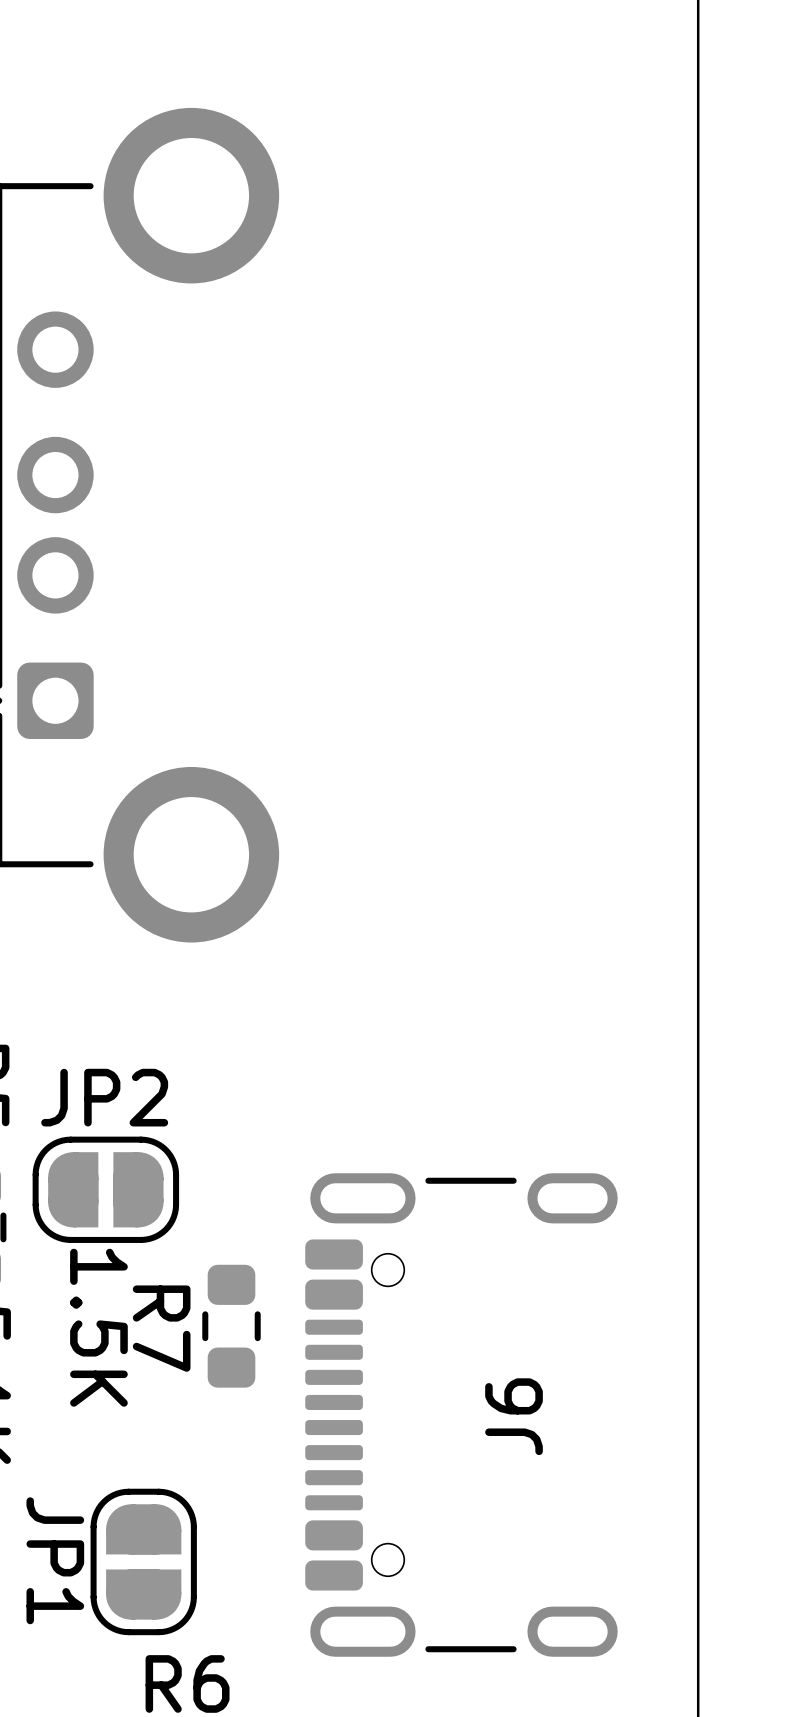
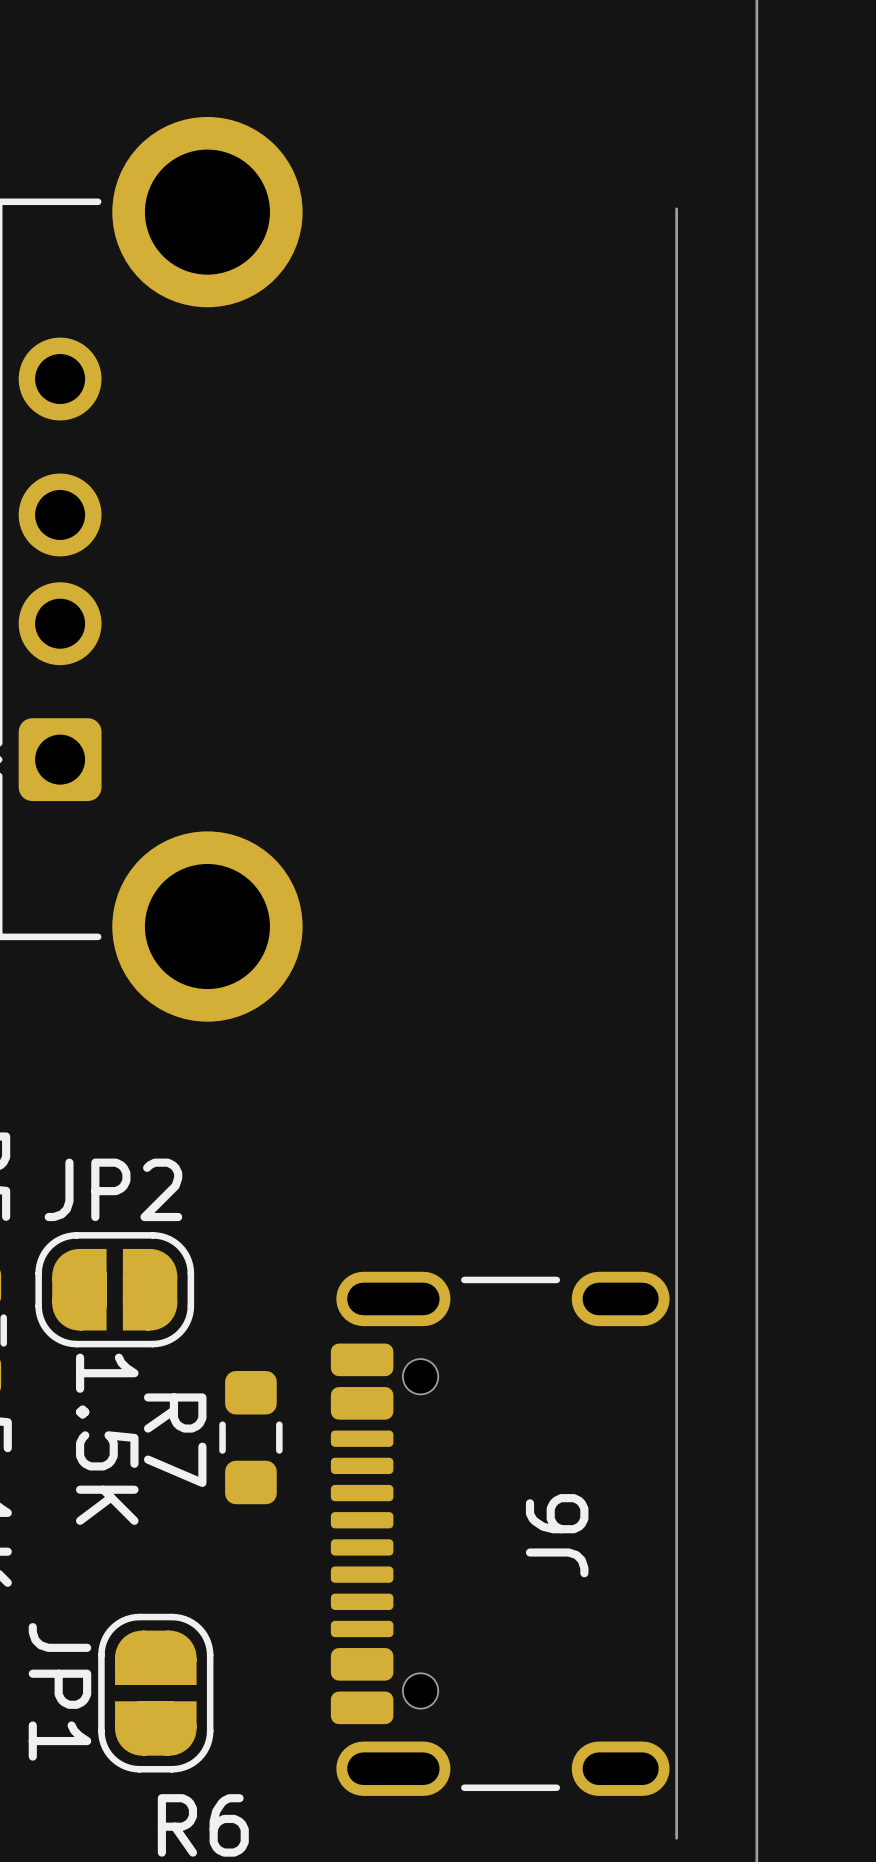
board edge: none -> (676, 208) (676, 1838)

